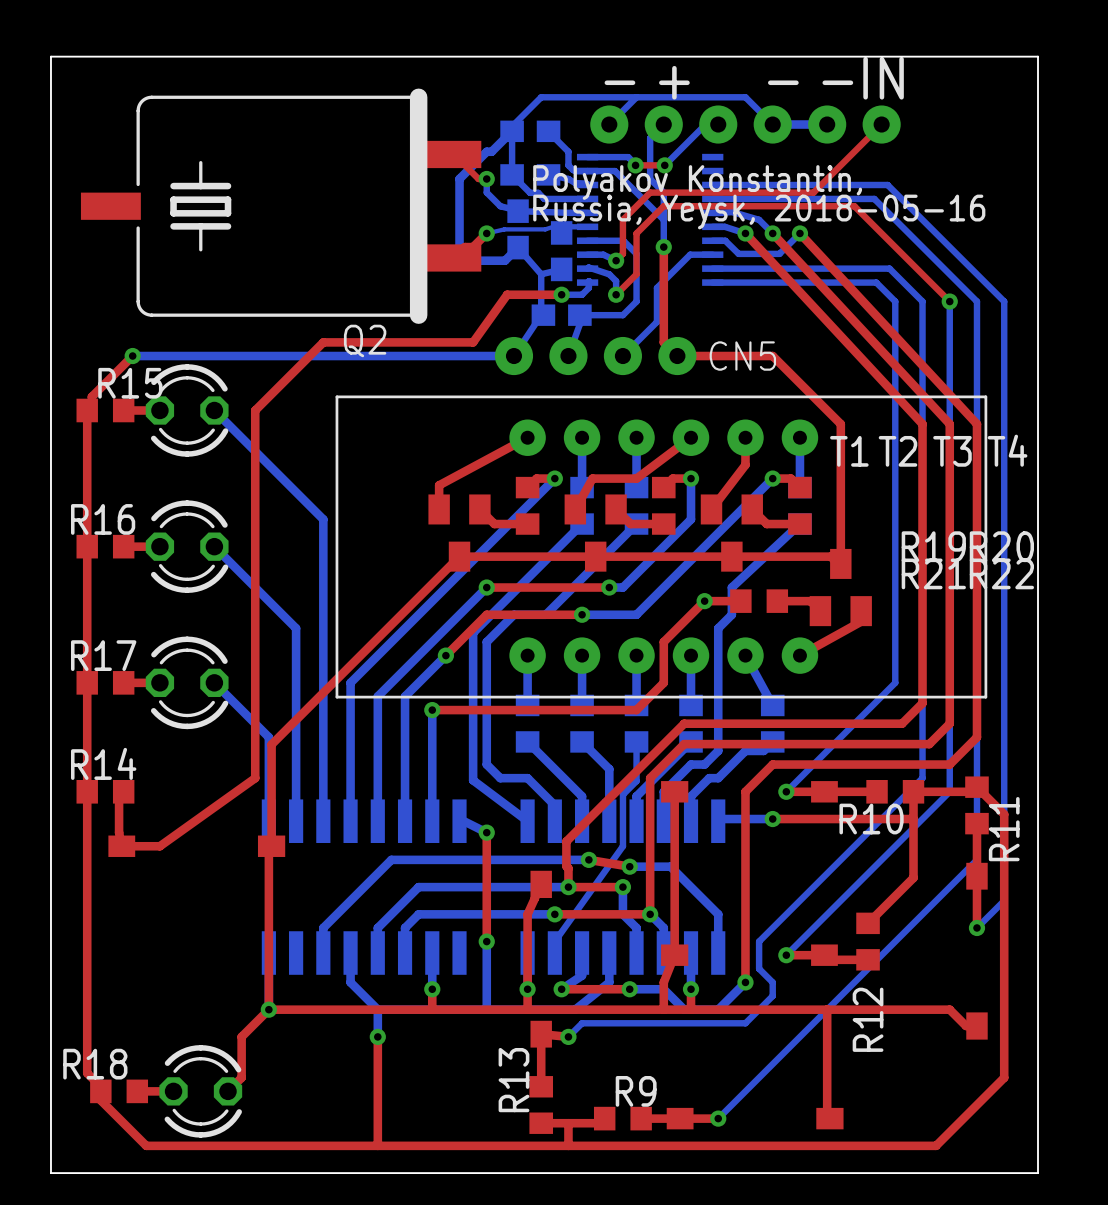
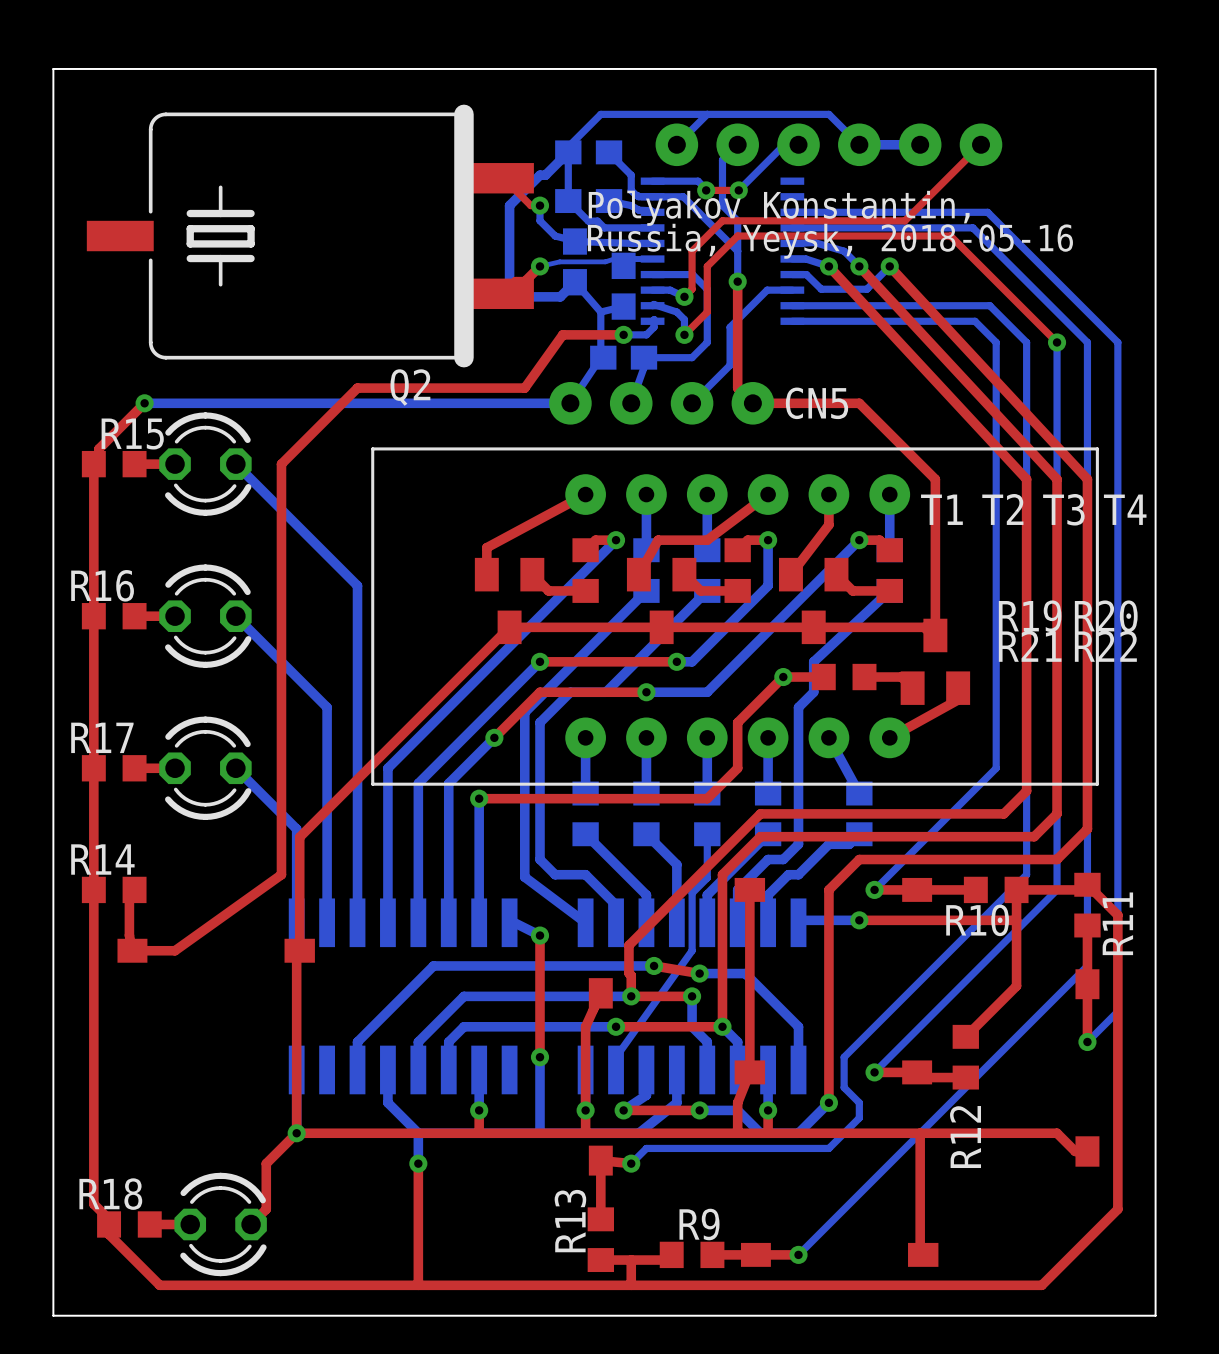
text: IN (883, 78) -> none
text: - (619, 82) -> none
text: + (674, 82) -> none
text: - (783, 82) -> none
text: - (837, 82) -> none

